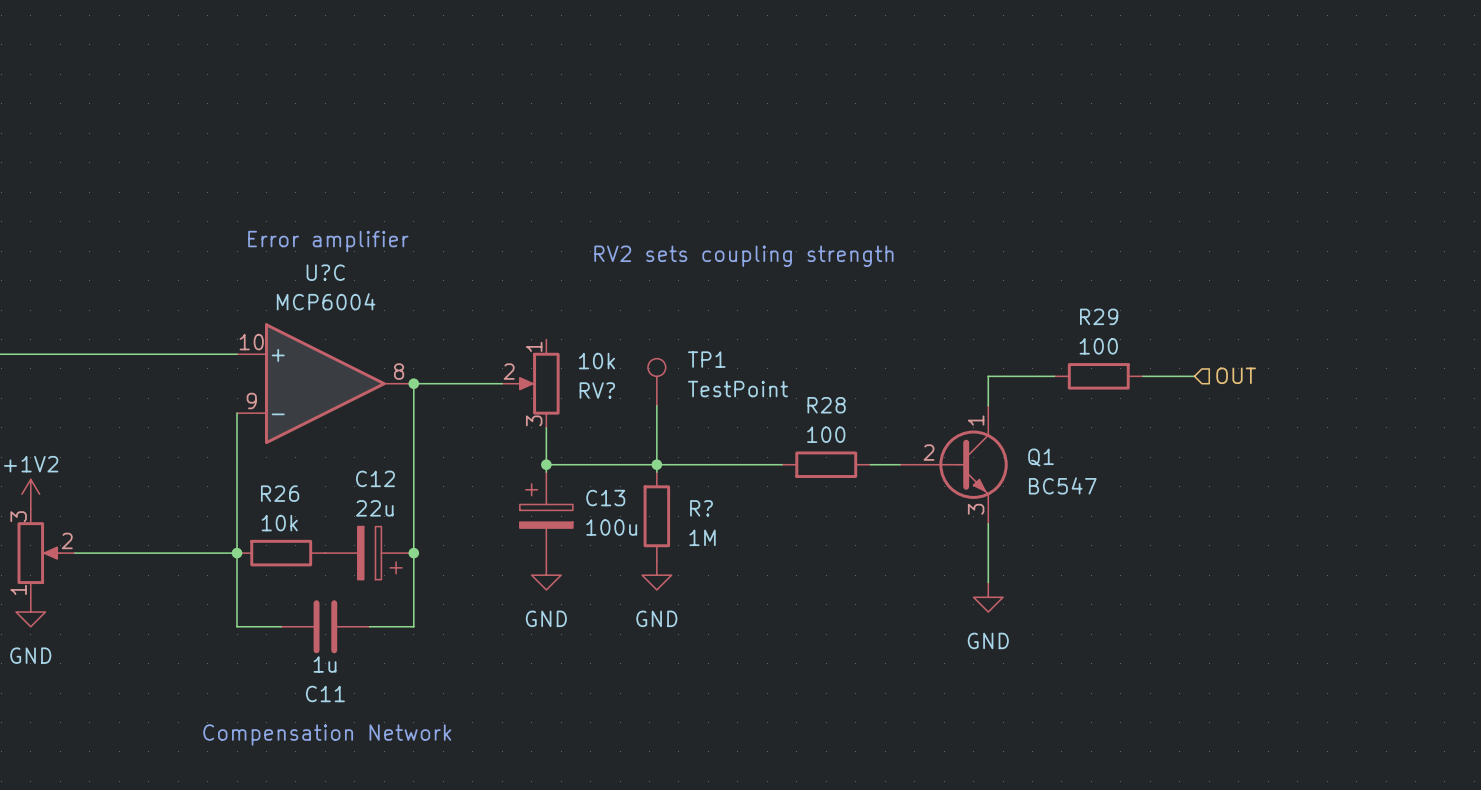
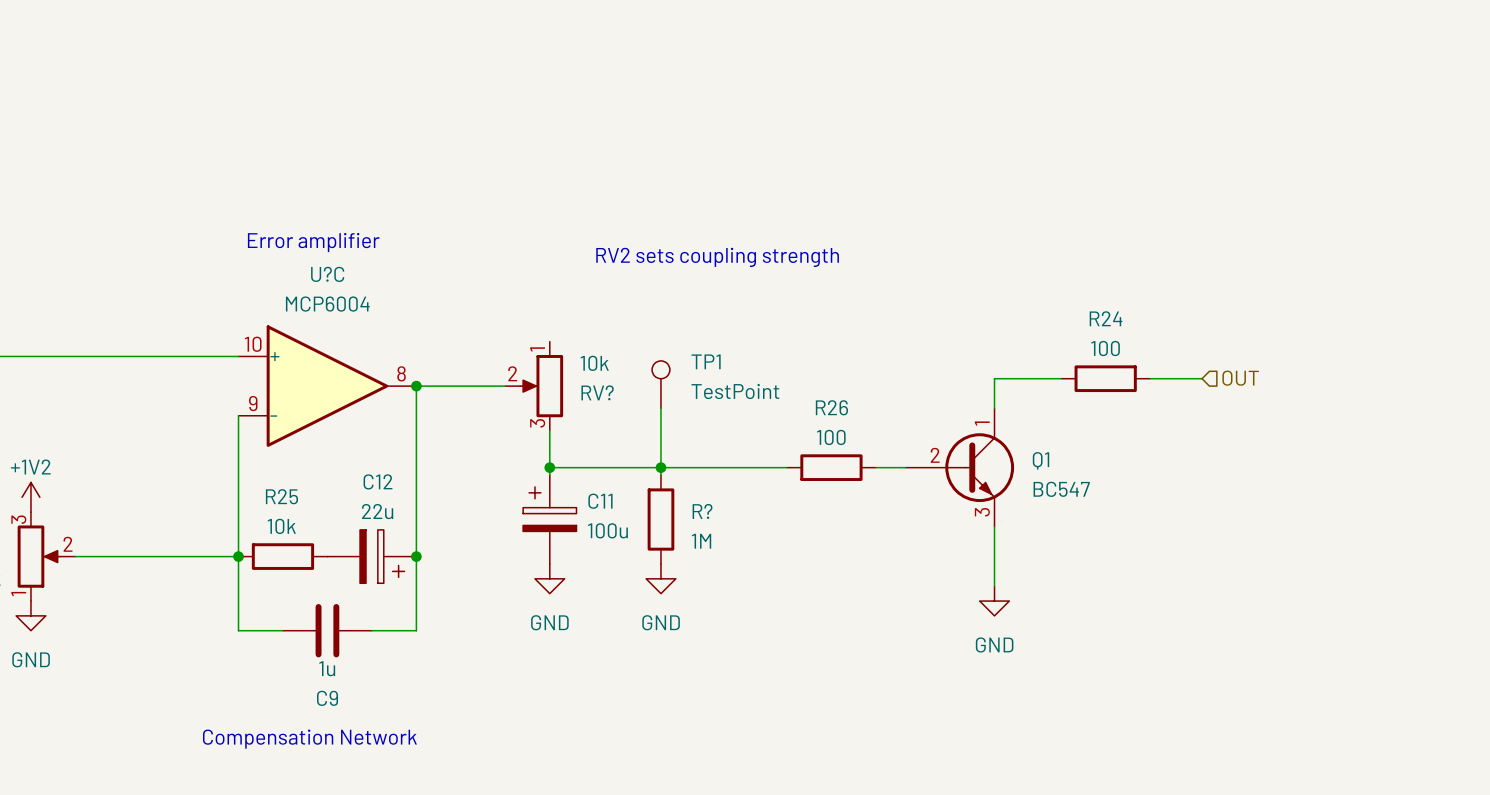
R29 name: R29 (1099, 316) -> R24 (1106, 318)
R28 name: R28 (826, 405) -> R26 (831, 407)
R26 name: R26 (280, 493) -> R25 (281, 496)
C13 name: C13 (605, 498) -> C11 (600, 501)
C11 name: C11 (325, 693) -> C9 (327, 698)

